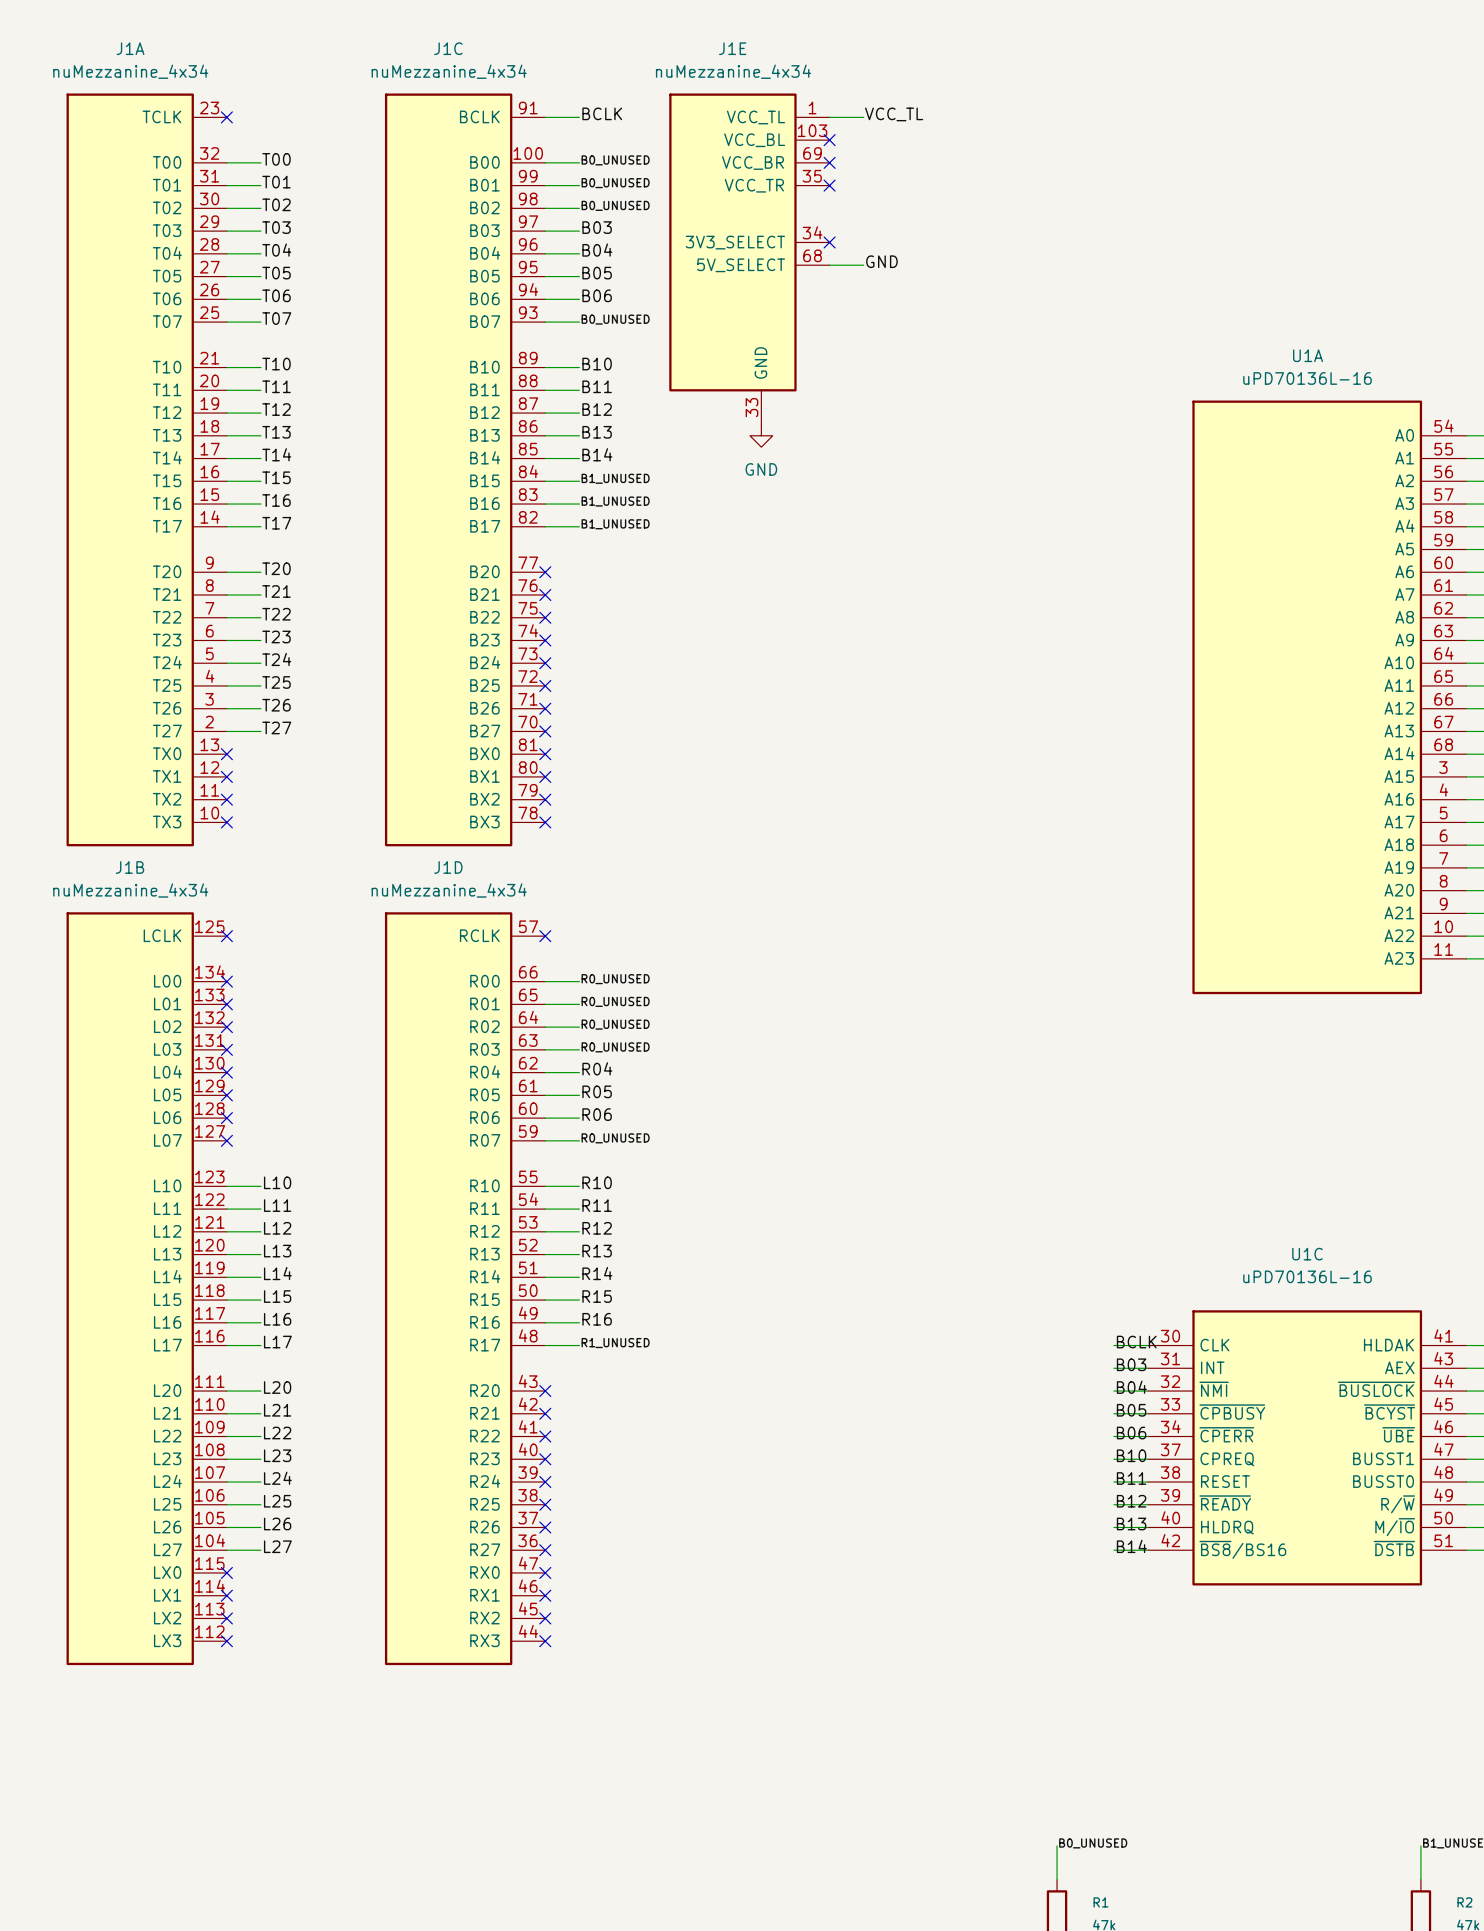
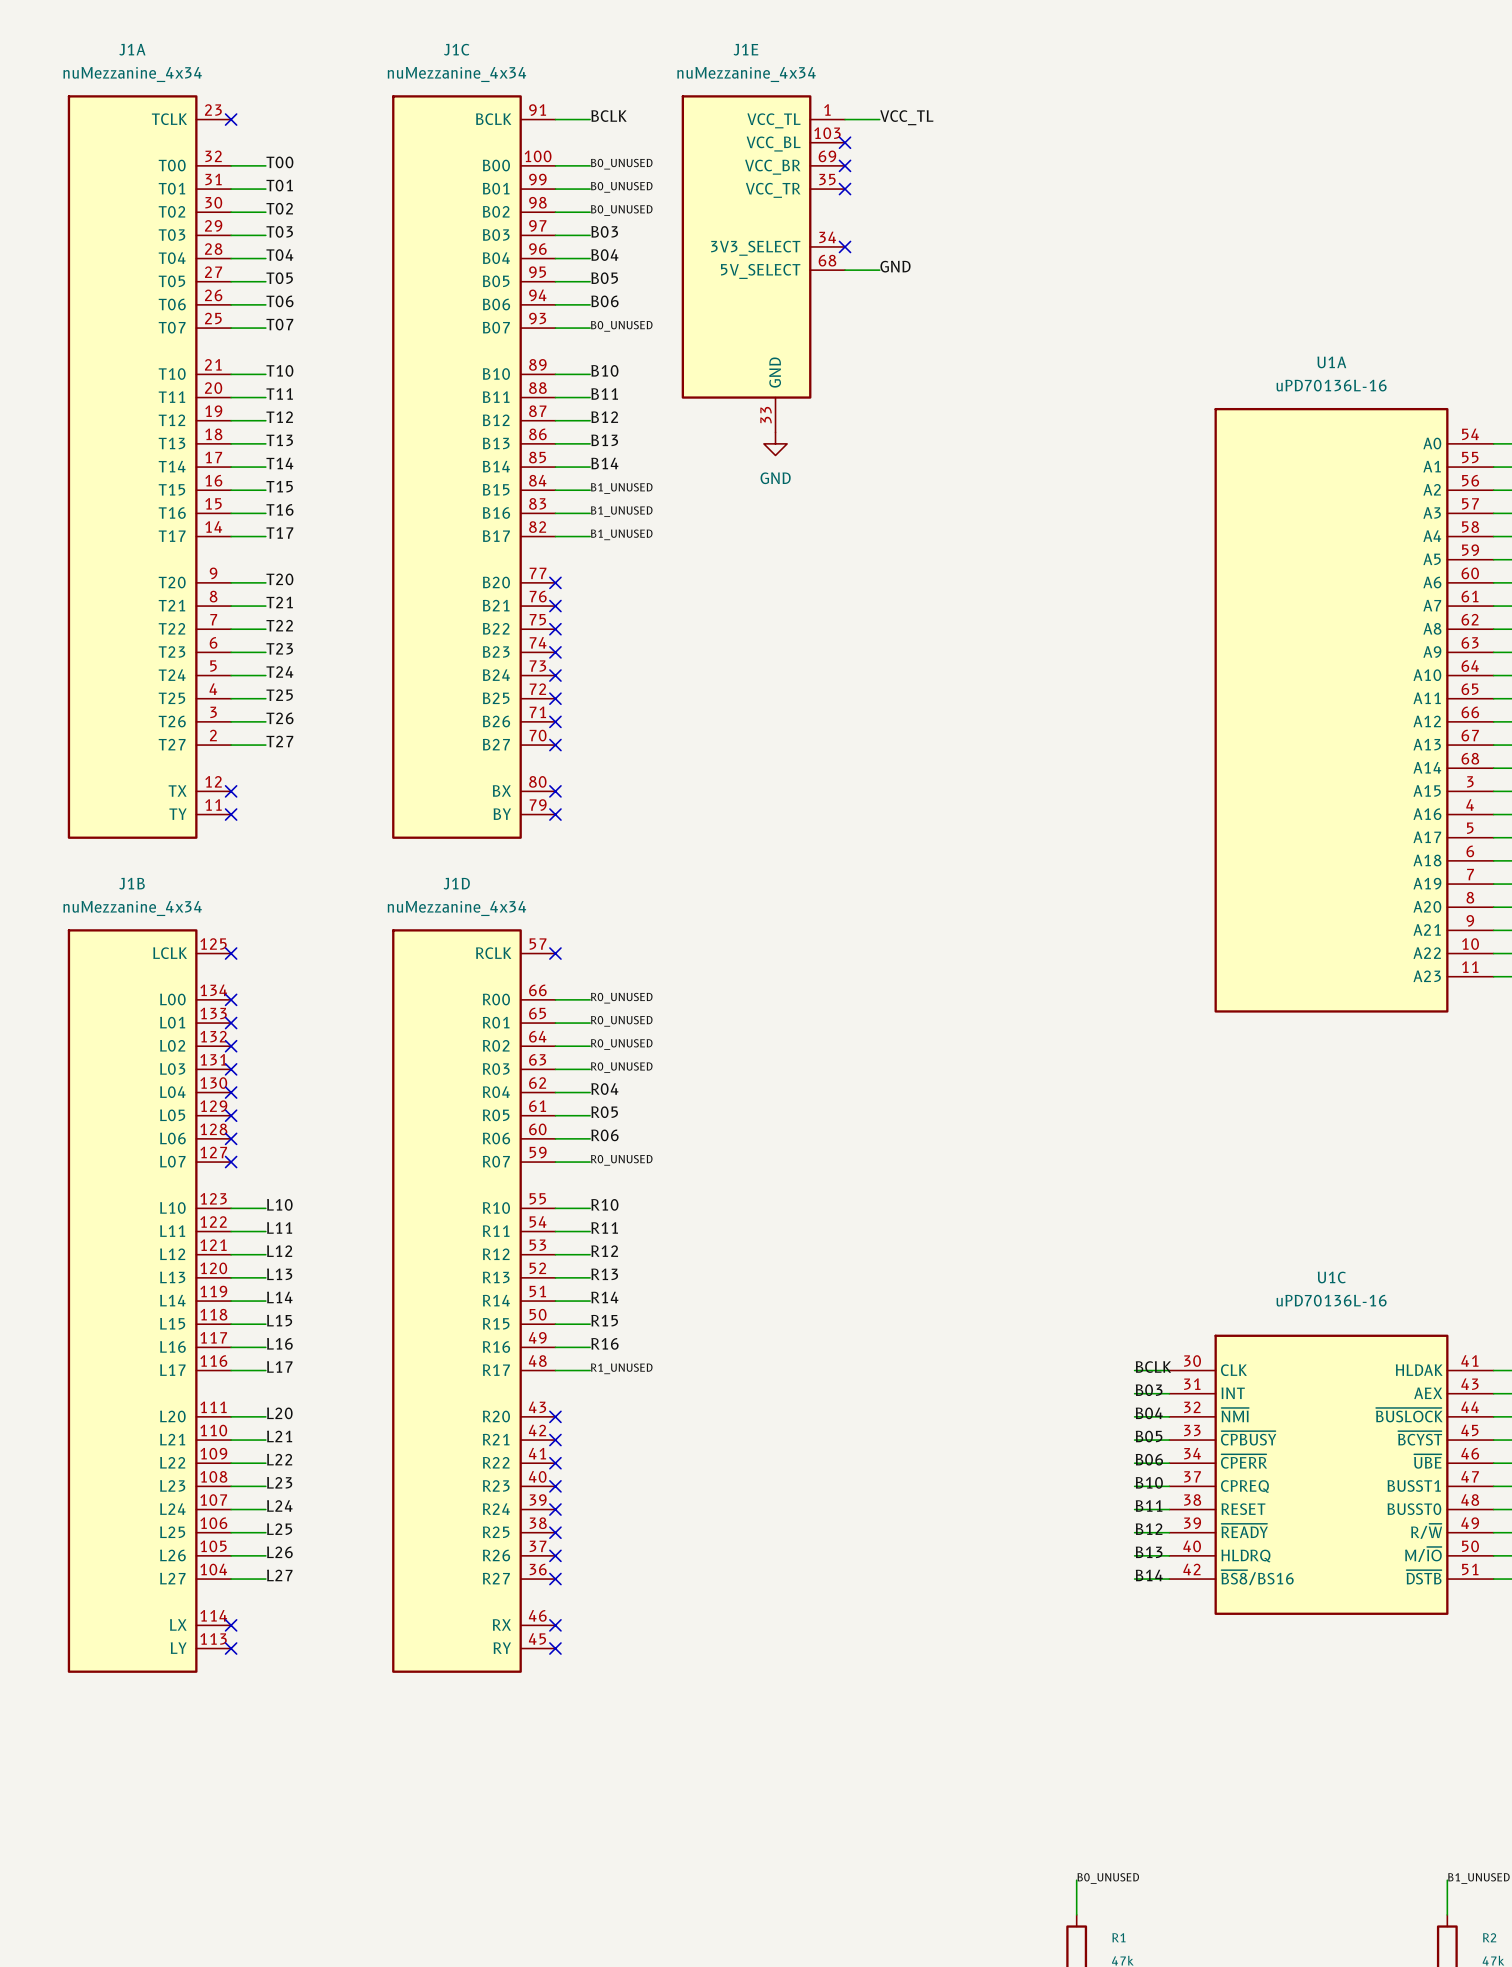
J1A symbol: [66, 93, 227, 847] -> [67, 95, 232, 839]
J1C symbol: [384, 93, 546, 847] -> [392, 95, 556, 839]
no-connect mark: (226, 754) -> none
no-connect mark: (545, 754) -> none
no-connect mark: (226, 822) -> none
no-connect mark: (545, 822) -> none
J1B symbol: [66, 912, 227, 1666] -> [67, 929, 232, 1673]
J1D symbol: [384, 912, 546, 1666] -> [392, 929, 556, 1673]
no-connect mark: (226, 1572) -> none
no-connect mark: (545, 1572) -> none
no-connect mark: (226, 1641) -> none
no-connect mark: (545, 1641) -> none

